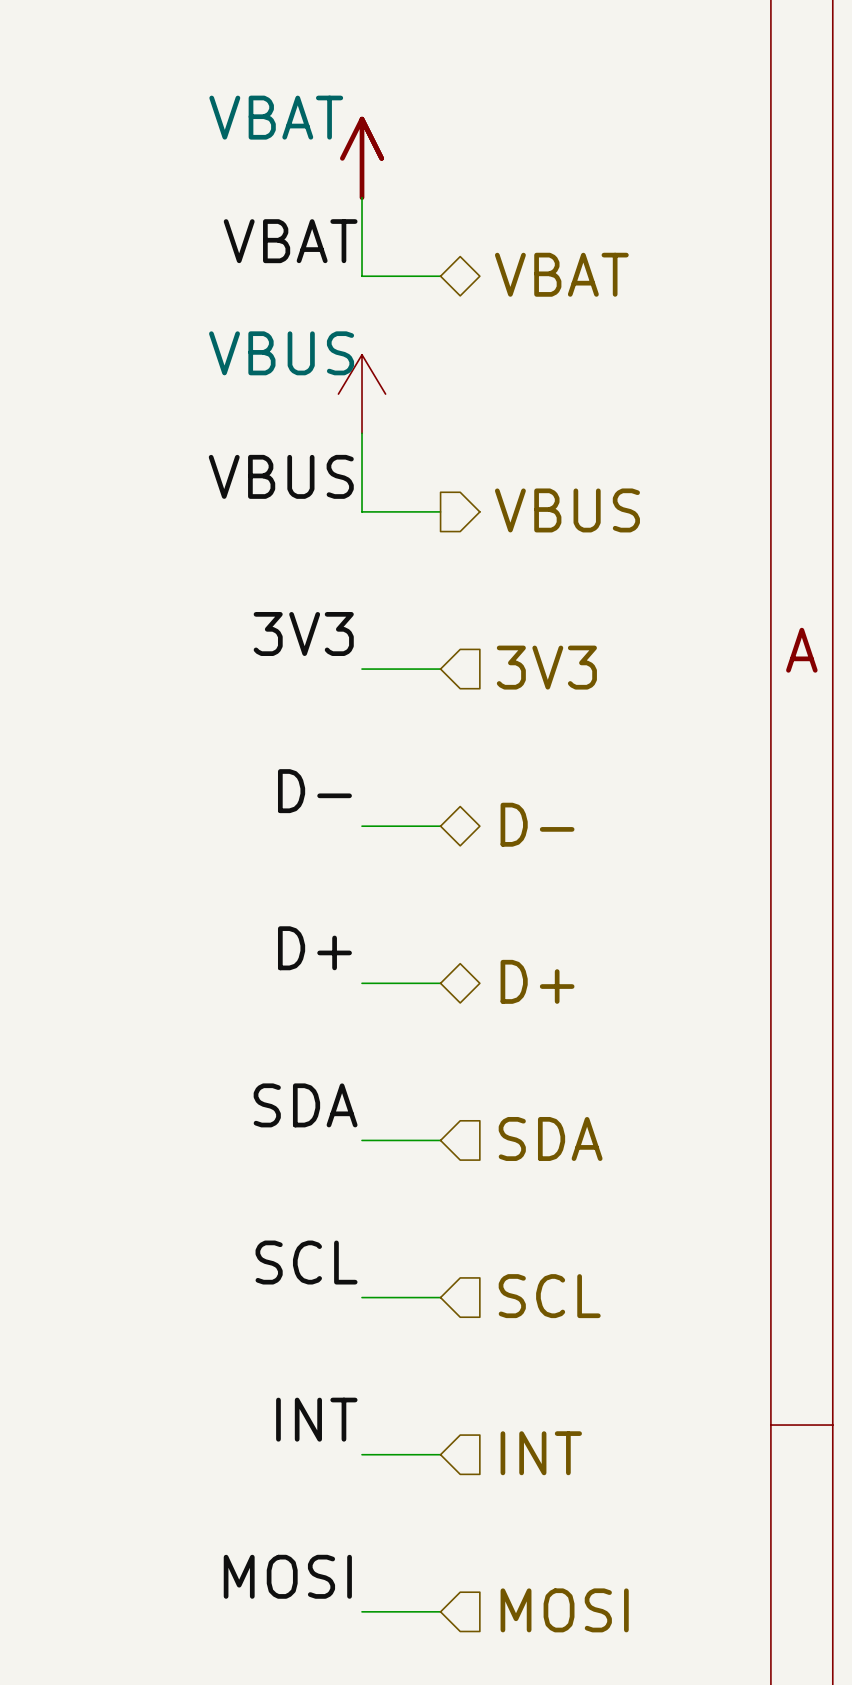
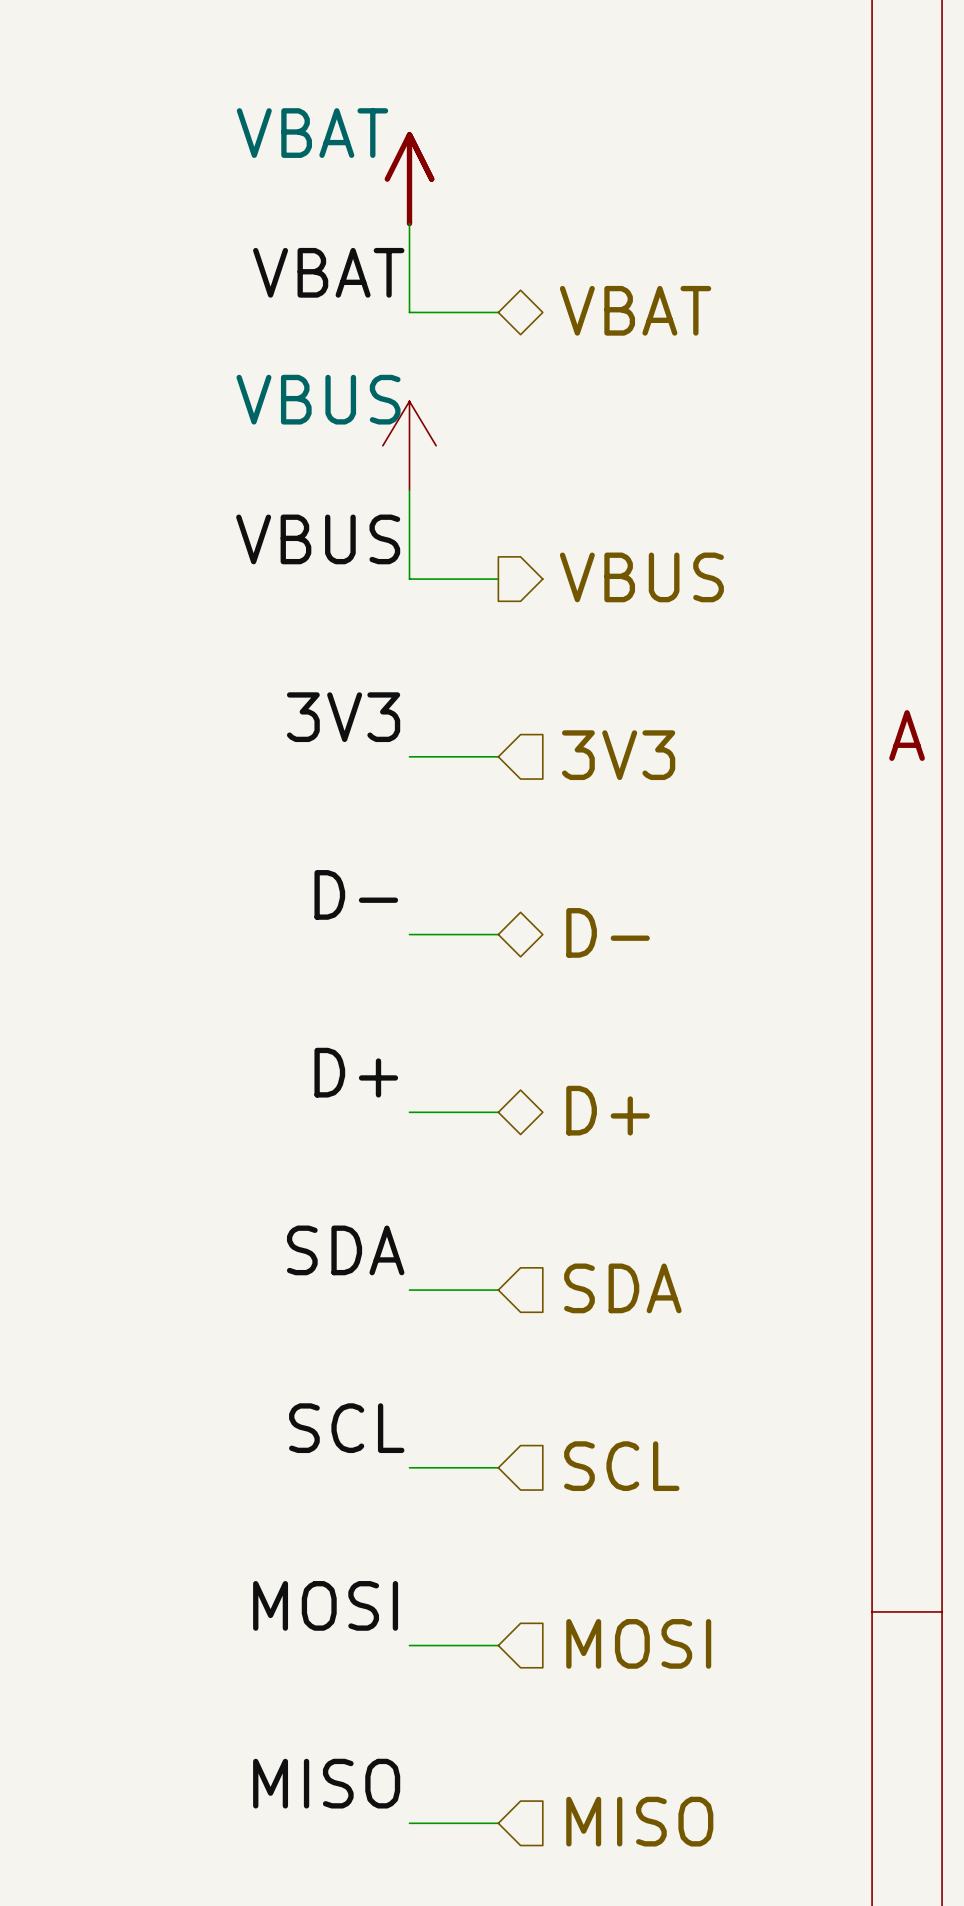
label: INT (316, 1419) -> MOSI (325, 1605)
hierarchical label: INT (541, 1453) -> MOSI (638, 1643)
label: MOSI (287, 1576) -> MISO (326, 1783)
hierarchical label: MOSI (564, 1610) -> MISO (639, 1821)

